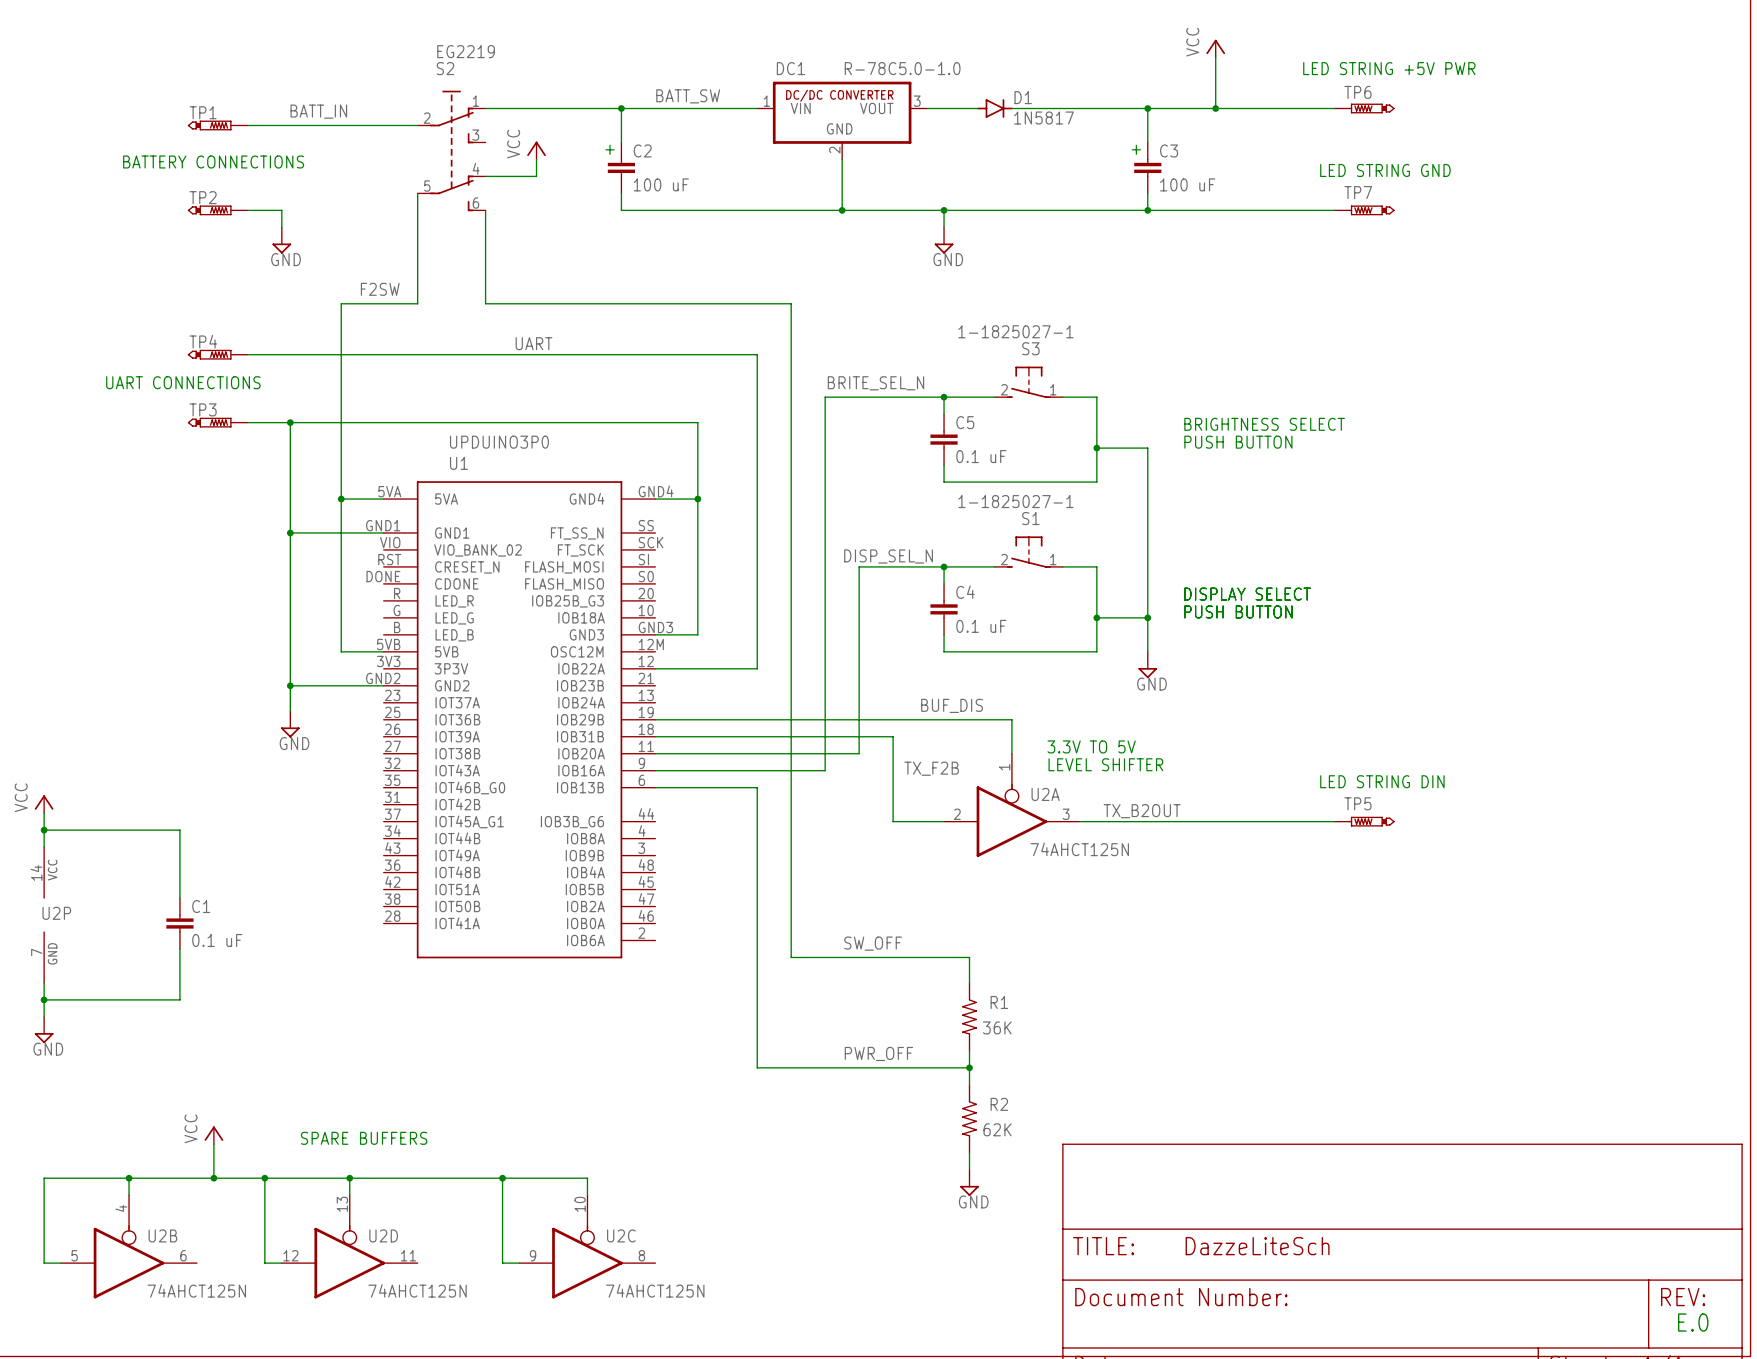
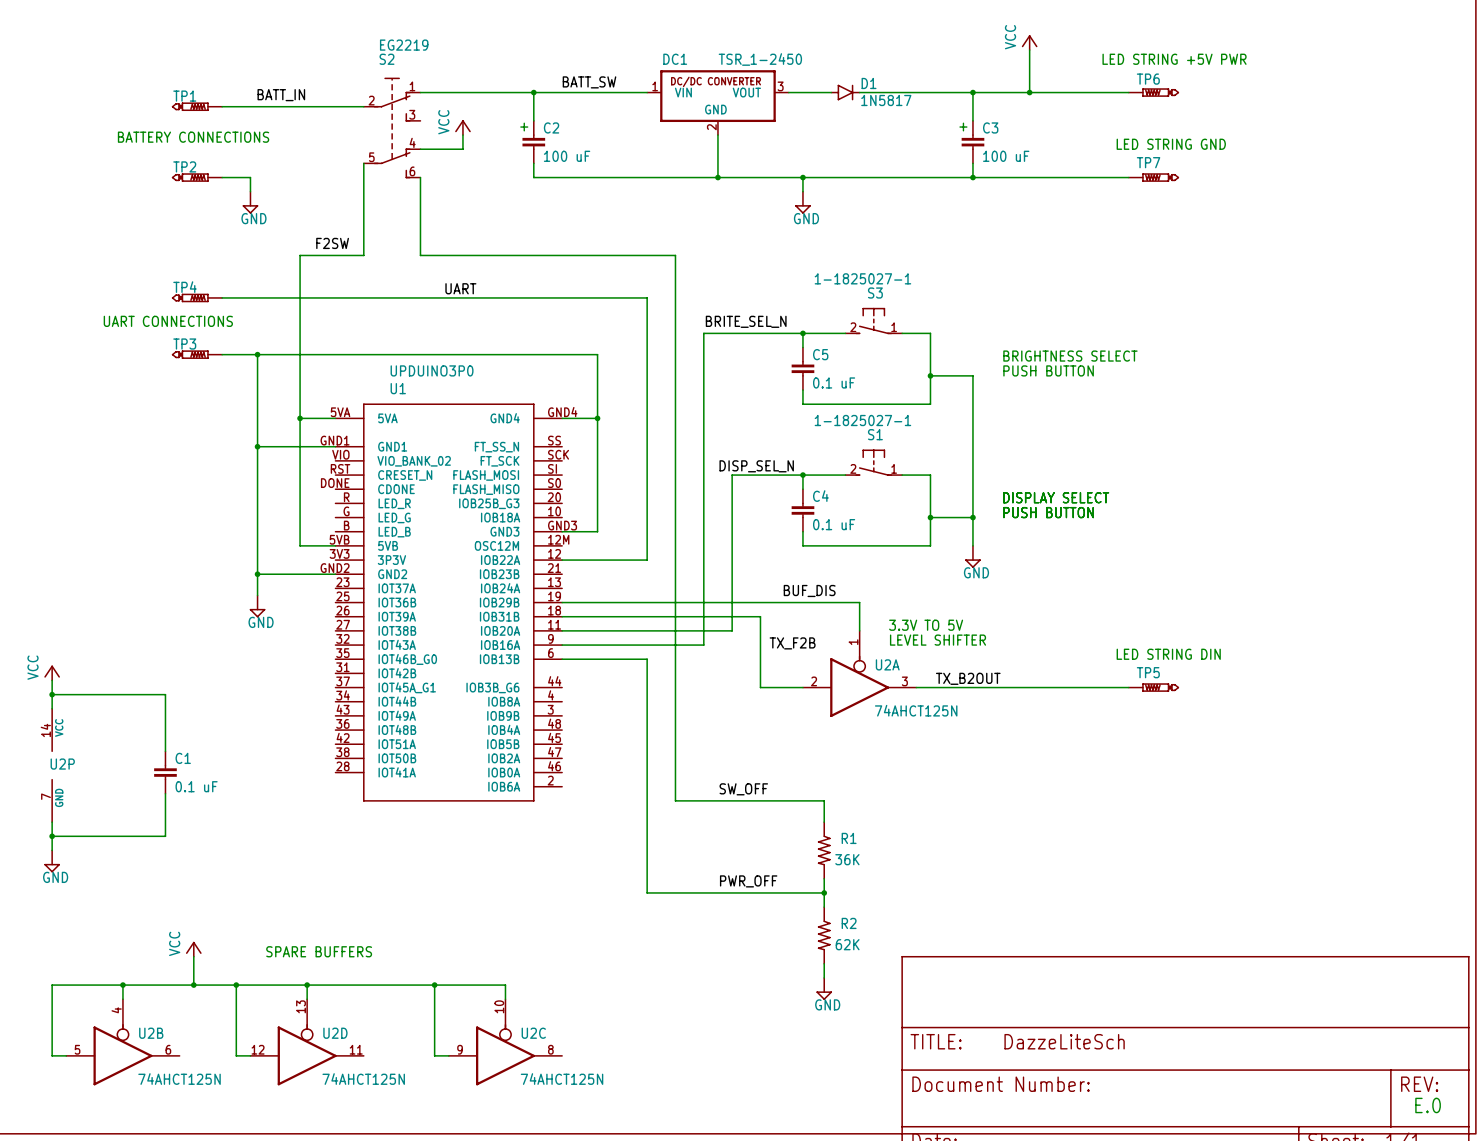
DC1 value: R-78C5.0-1.0 (902, 68) -> TSR_1-2450 (760, 59)

